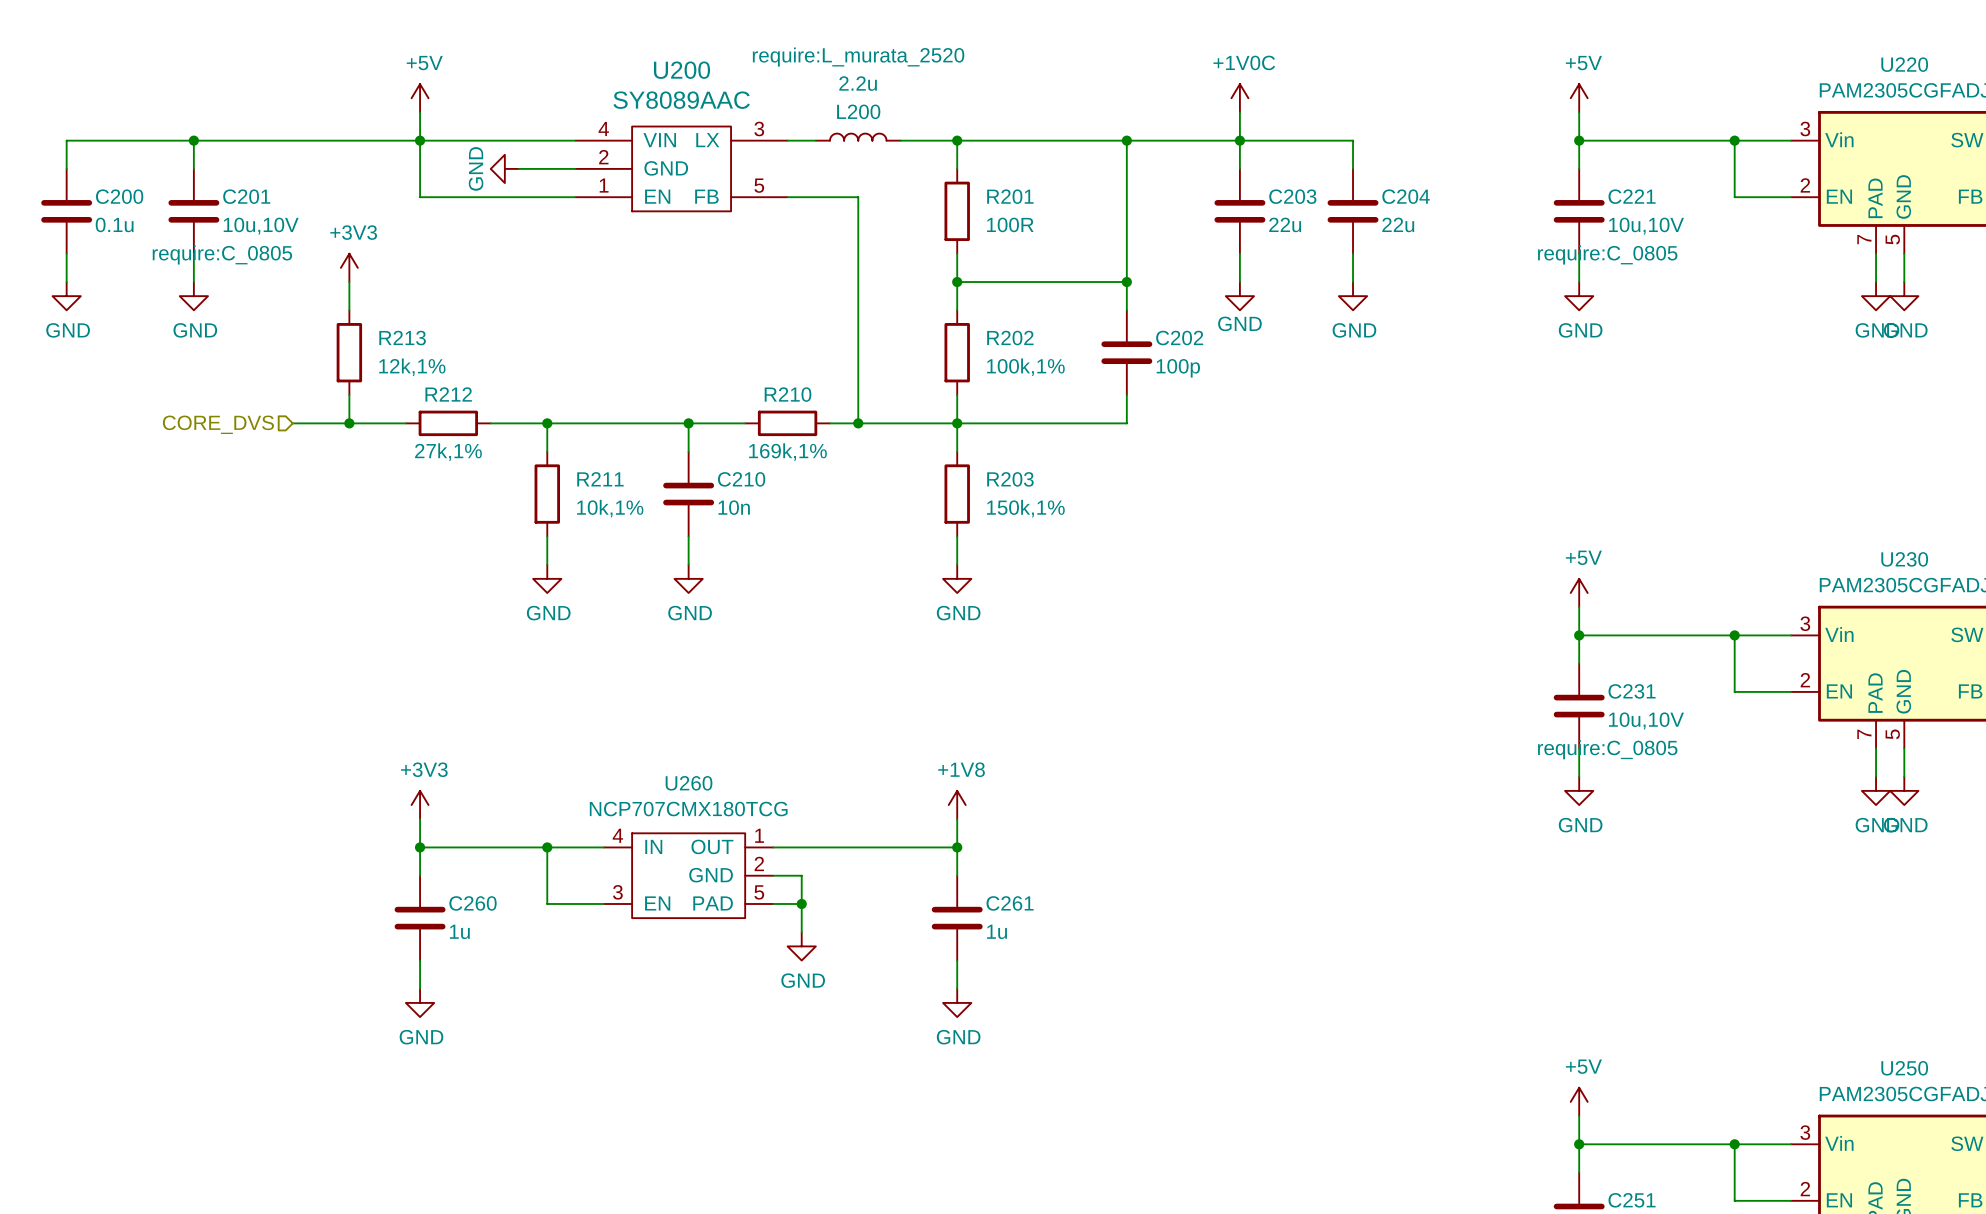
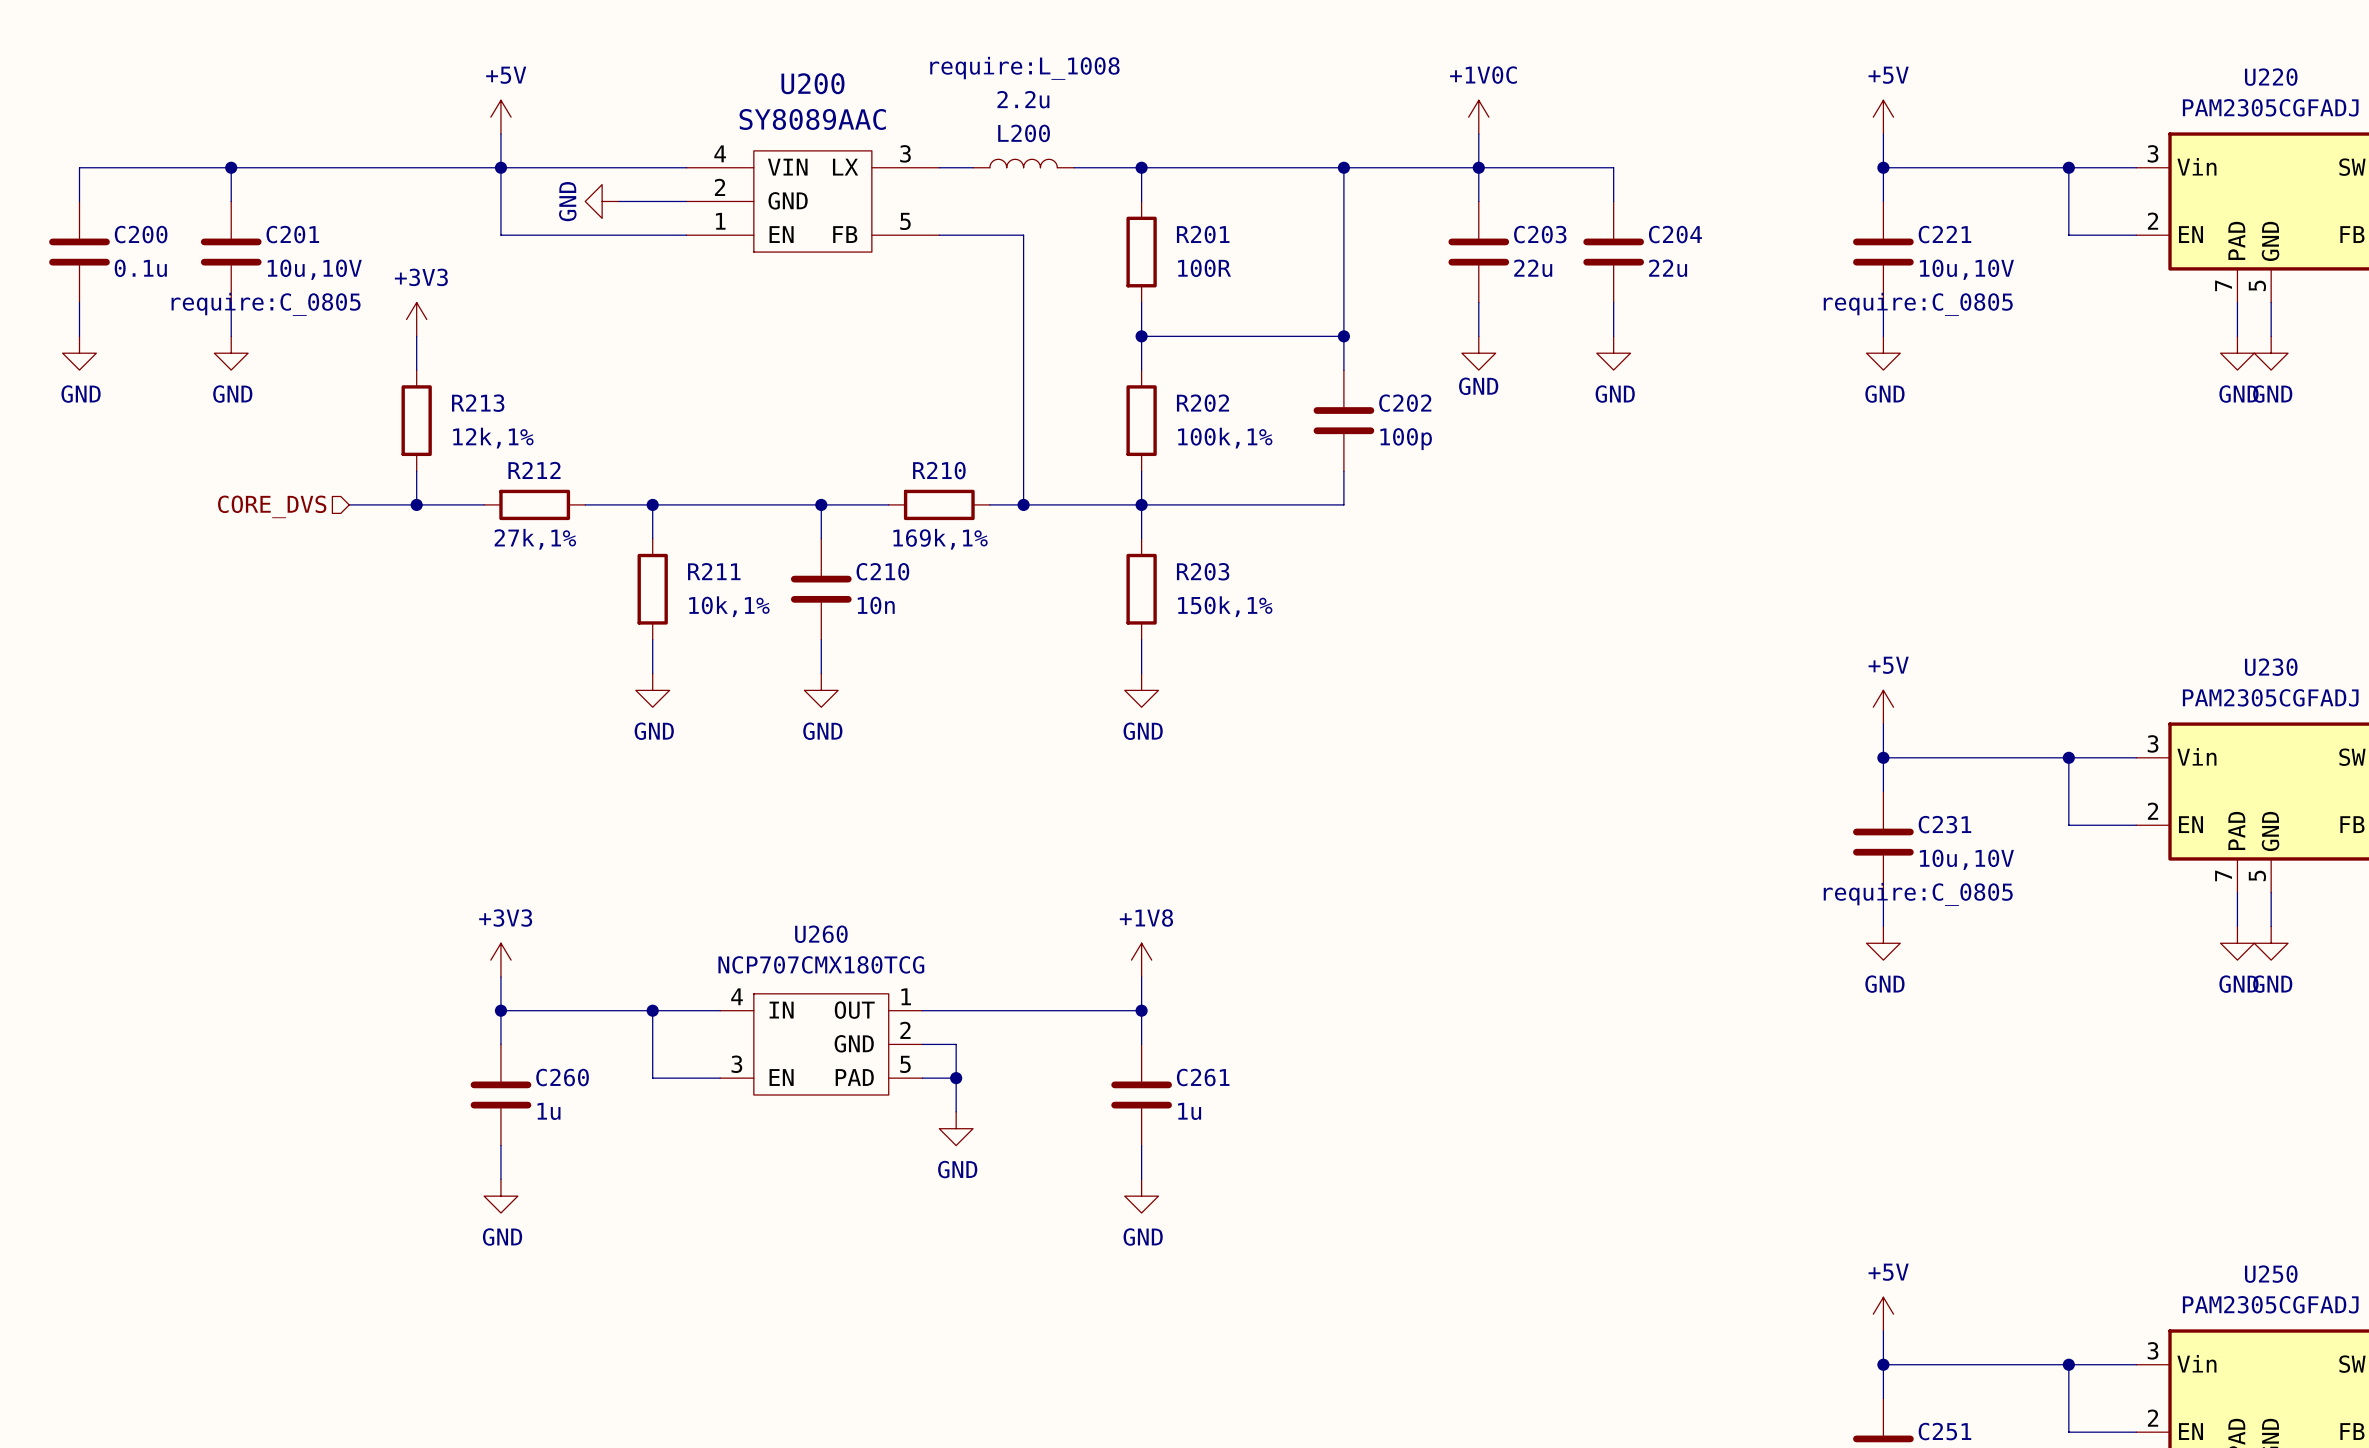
L200 text: require:L_murata_2520 (858, 57) -> require:L_1008 (1024, 68)

